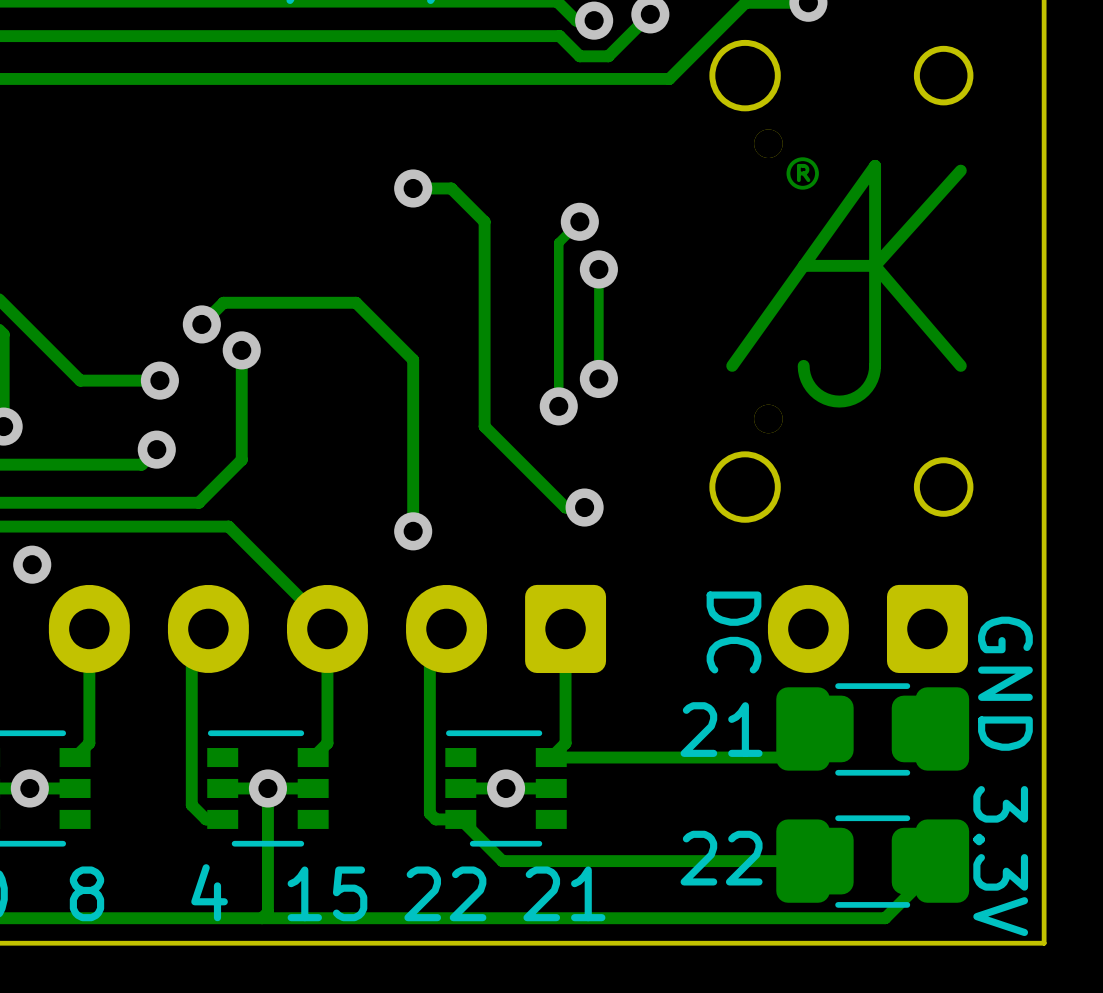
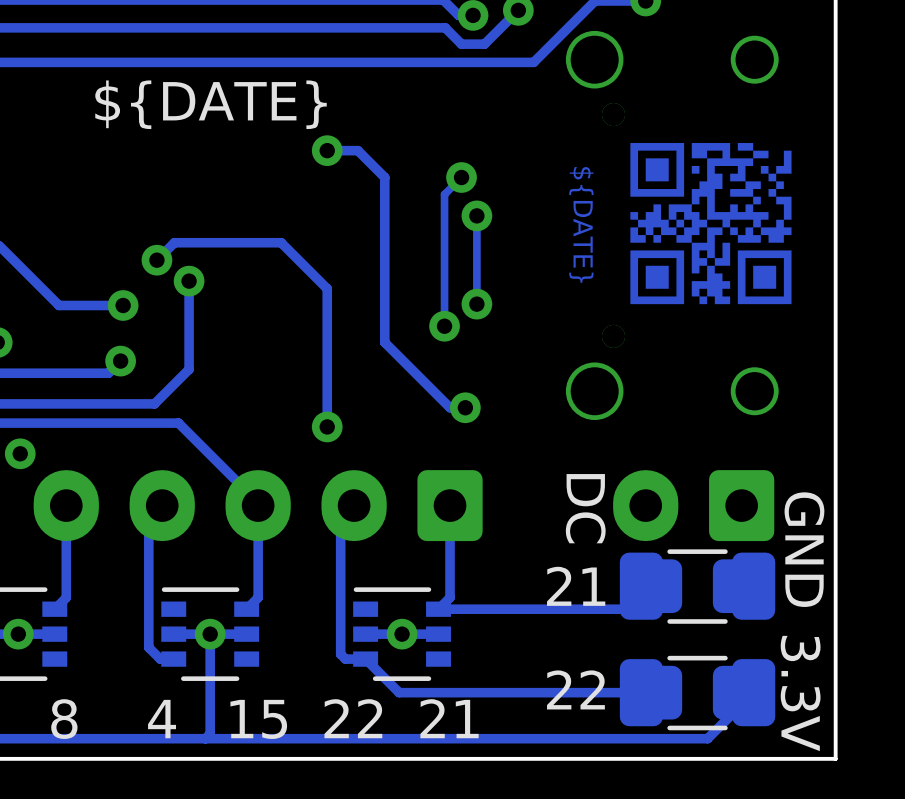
text: none -> ${DATE} (211, 104)
drawing: [726, 157, 967, 408] -> none
part: none -> (710, 223)
text: none -> ${DATE} (581, 224)

